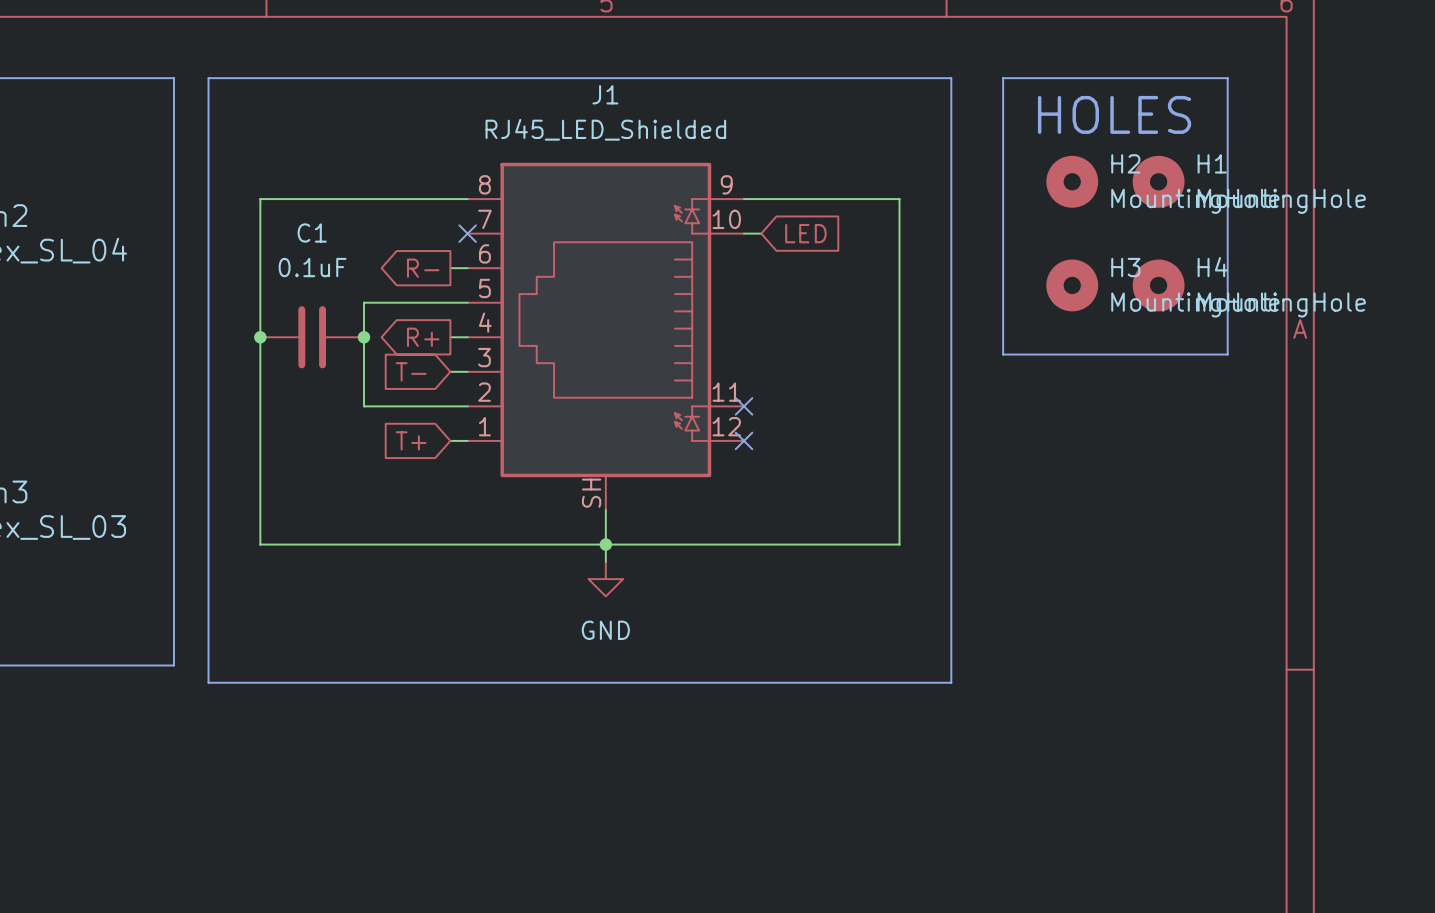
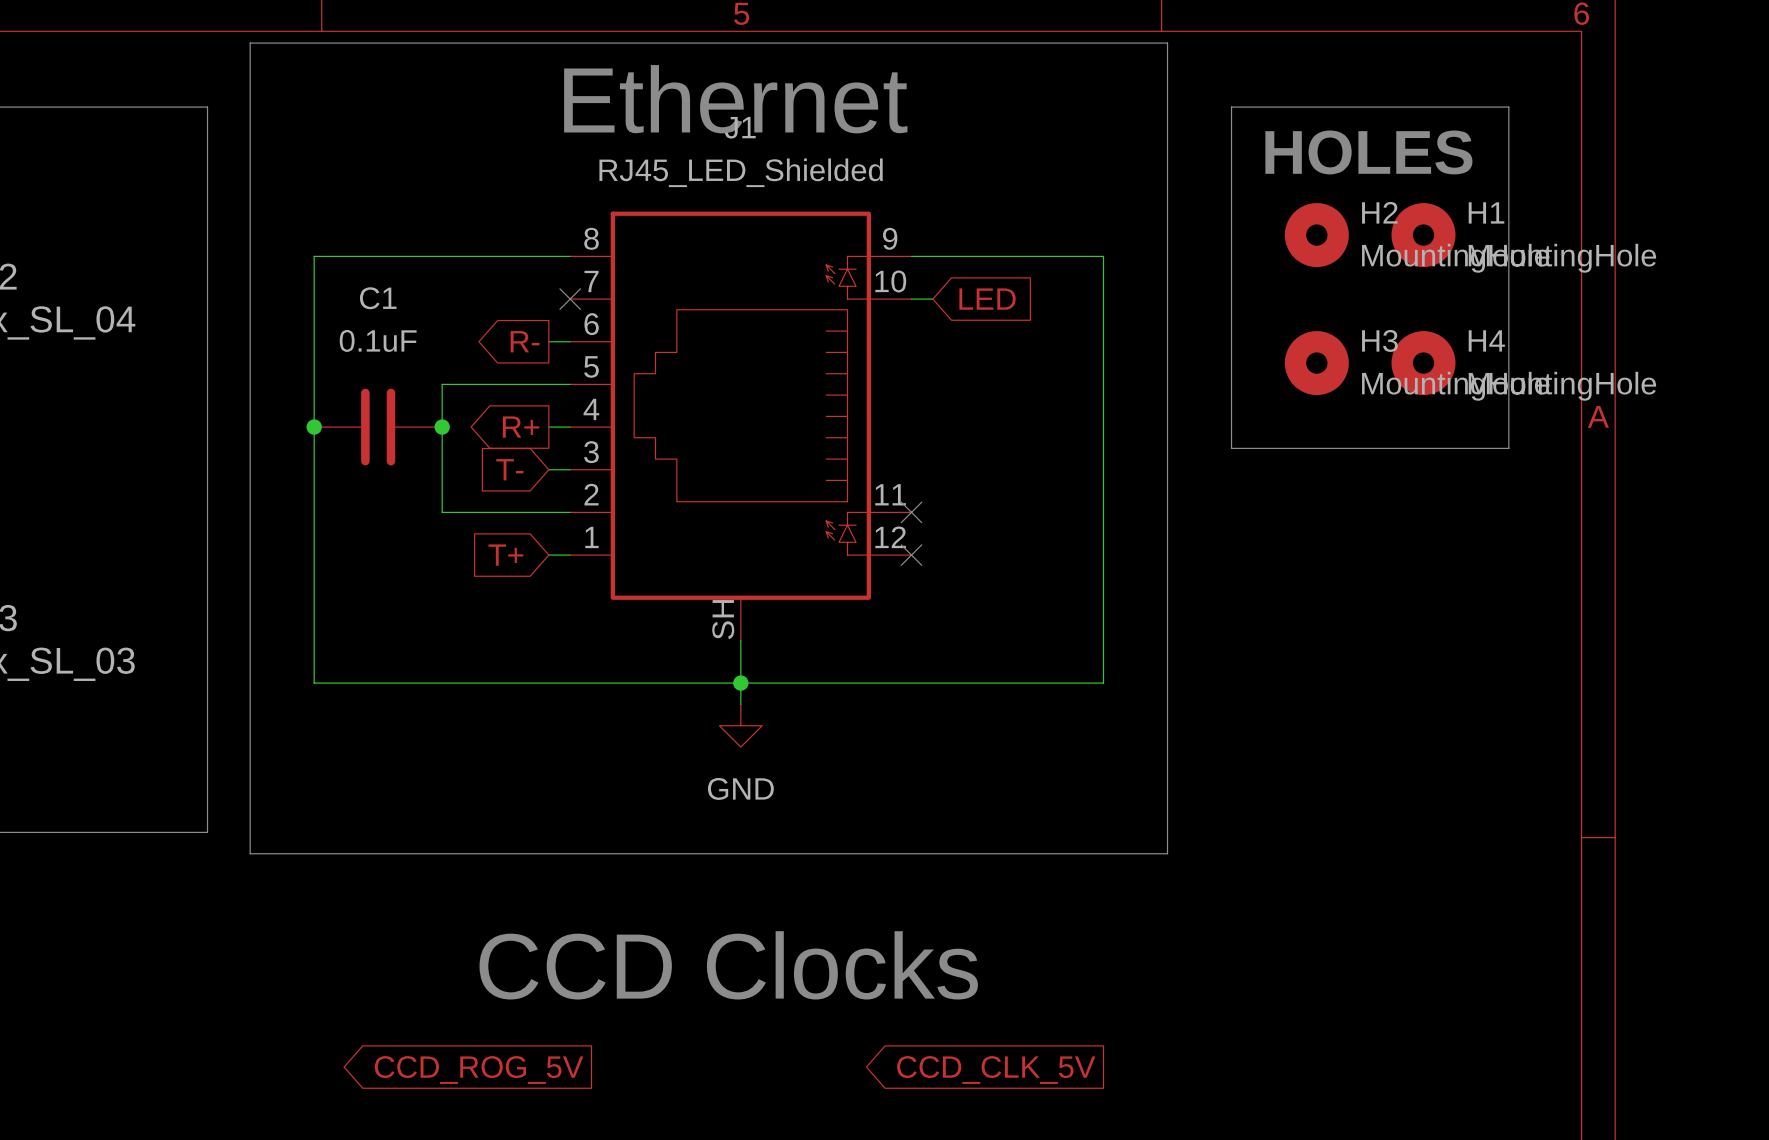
text: none -> Ethernet (735, 99)
line: (208, 78) (951, 78) -> (250, 107) (250, 43) (1167, 43) (1167, 107)
text: none -> CCD Clocks (728, 965)
global label: none -> CCD_ROG_5V (479, 1069)
global label: none -> CCD_CLK_5V (996, 1069)

